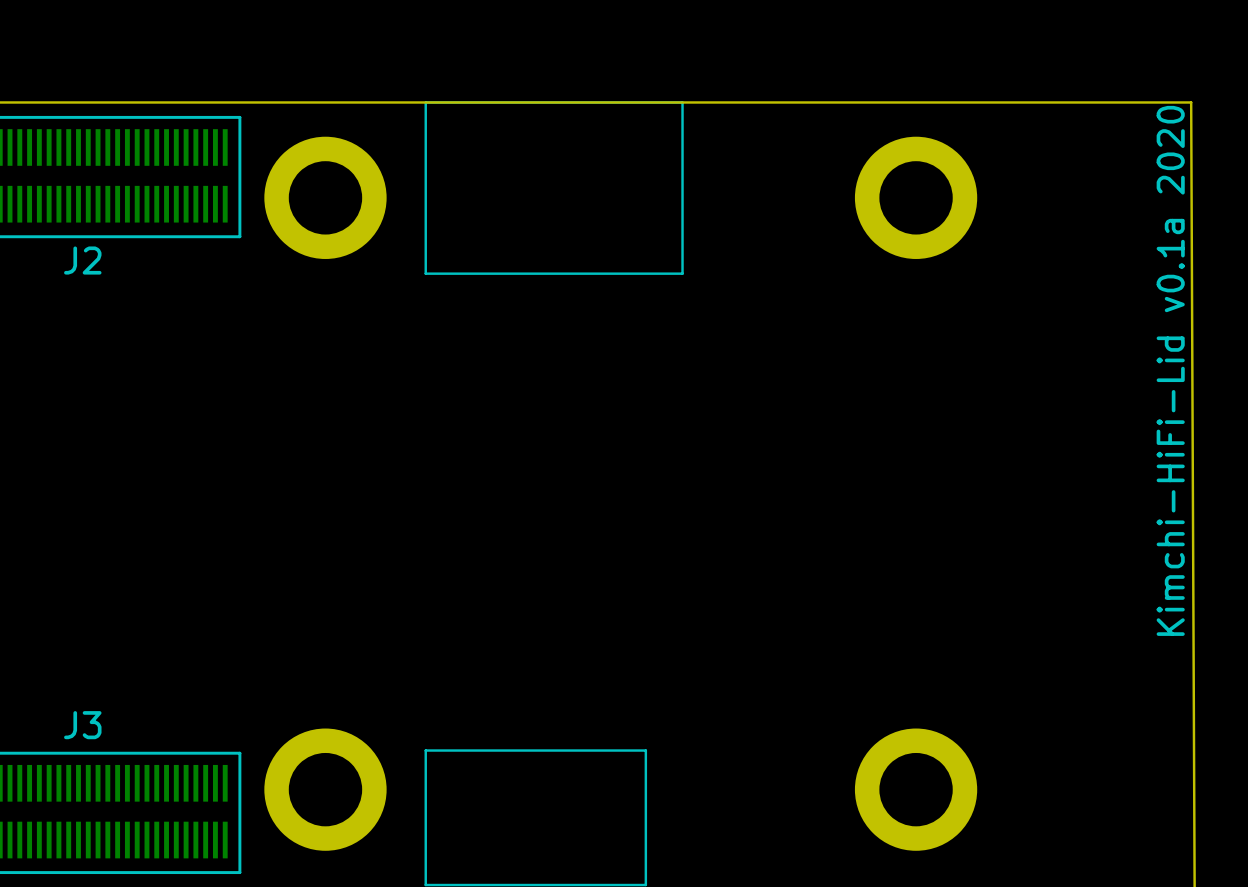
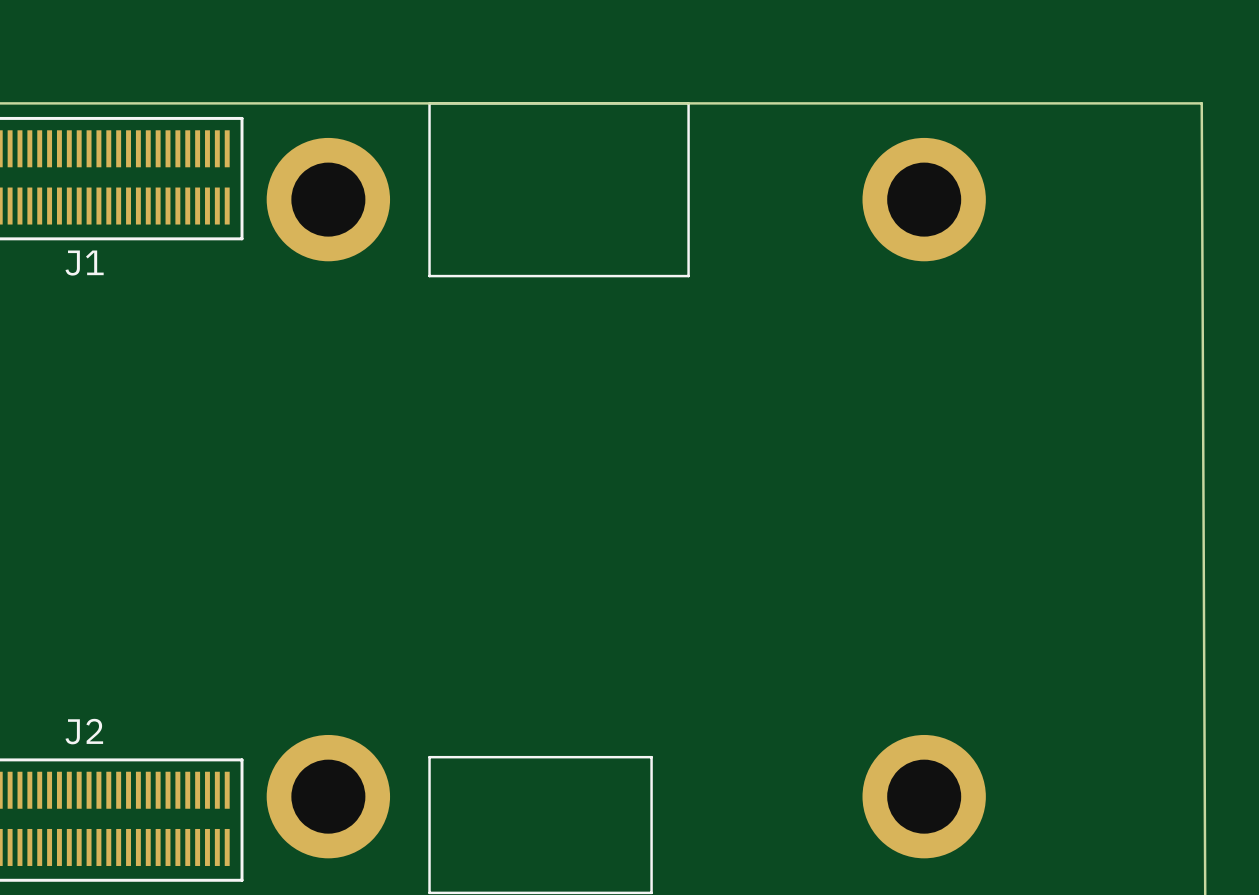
J2 name: J2 (82, 260) -> J1 (84, 263)
text: Kimchi-HiFi-Lid v0.1a 2020 (1170, 370) -> none
J3 name: J3 (82, 725) -> J2 (84, 731)

